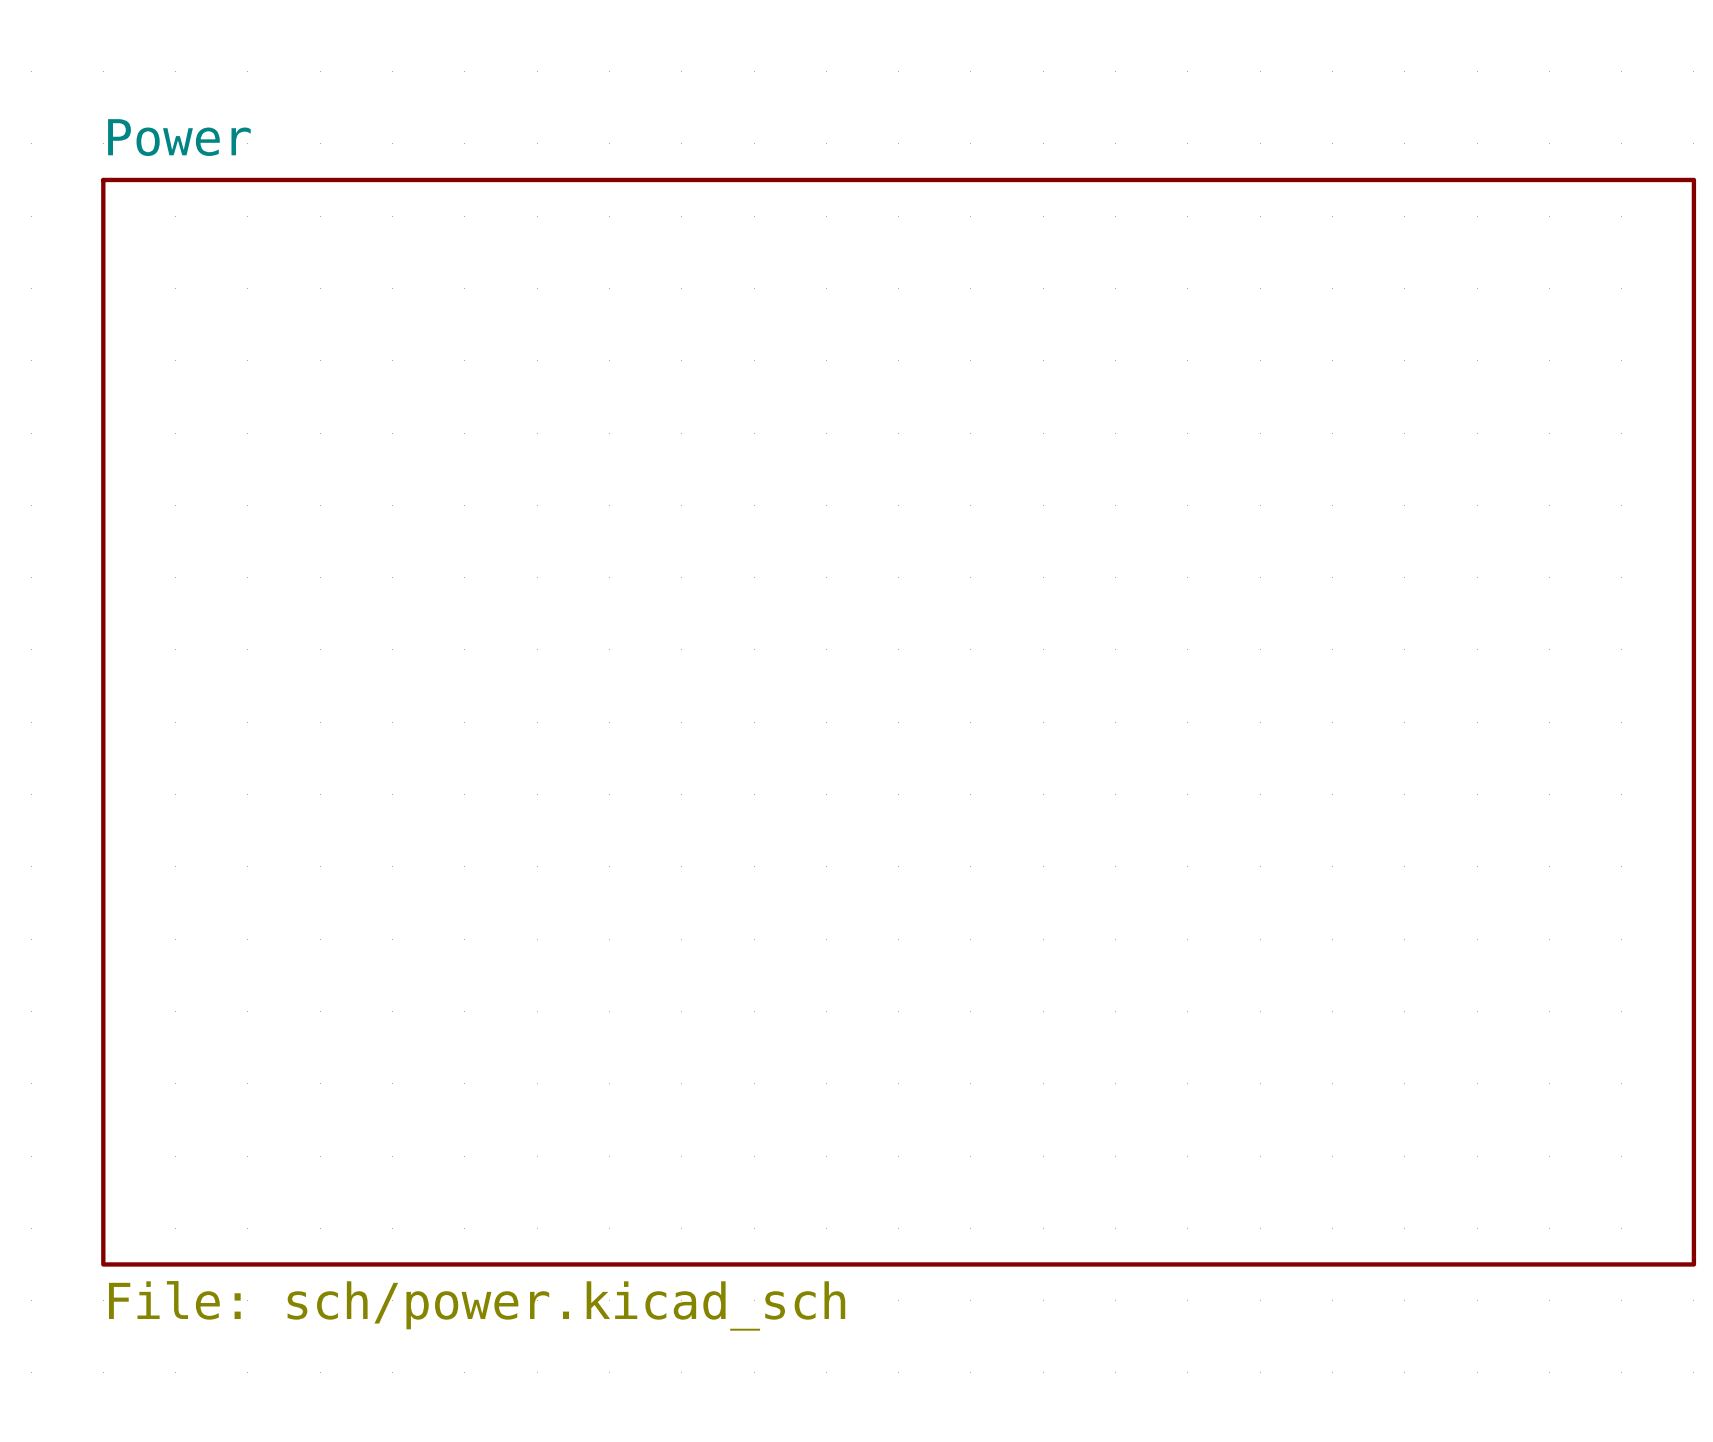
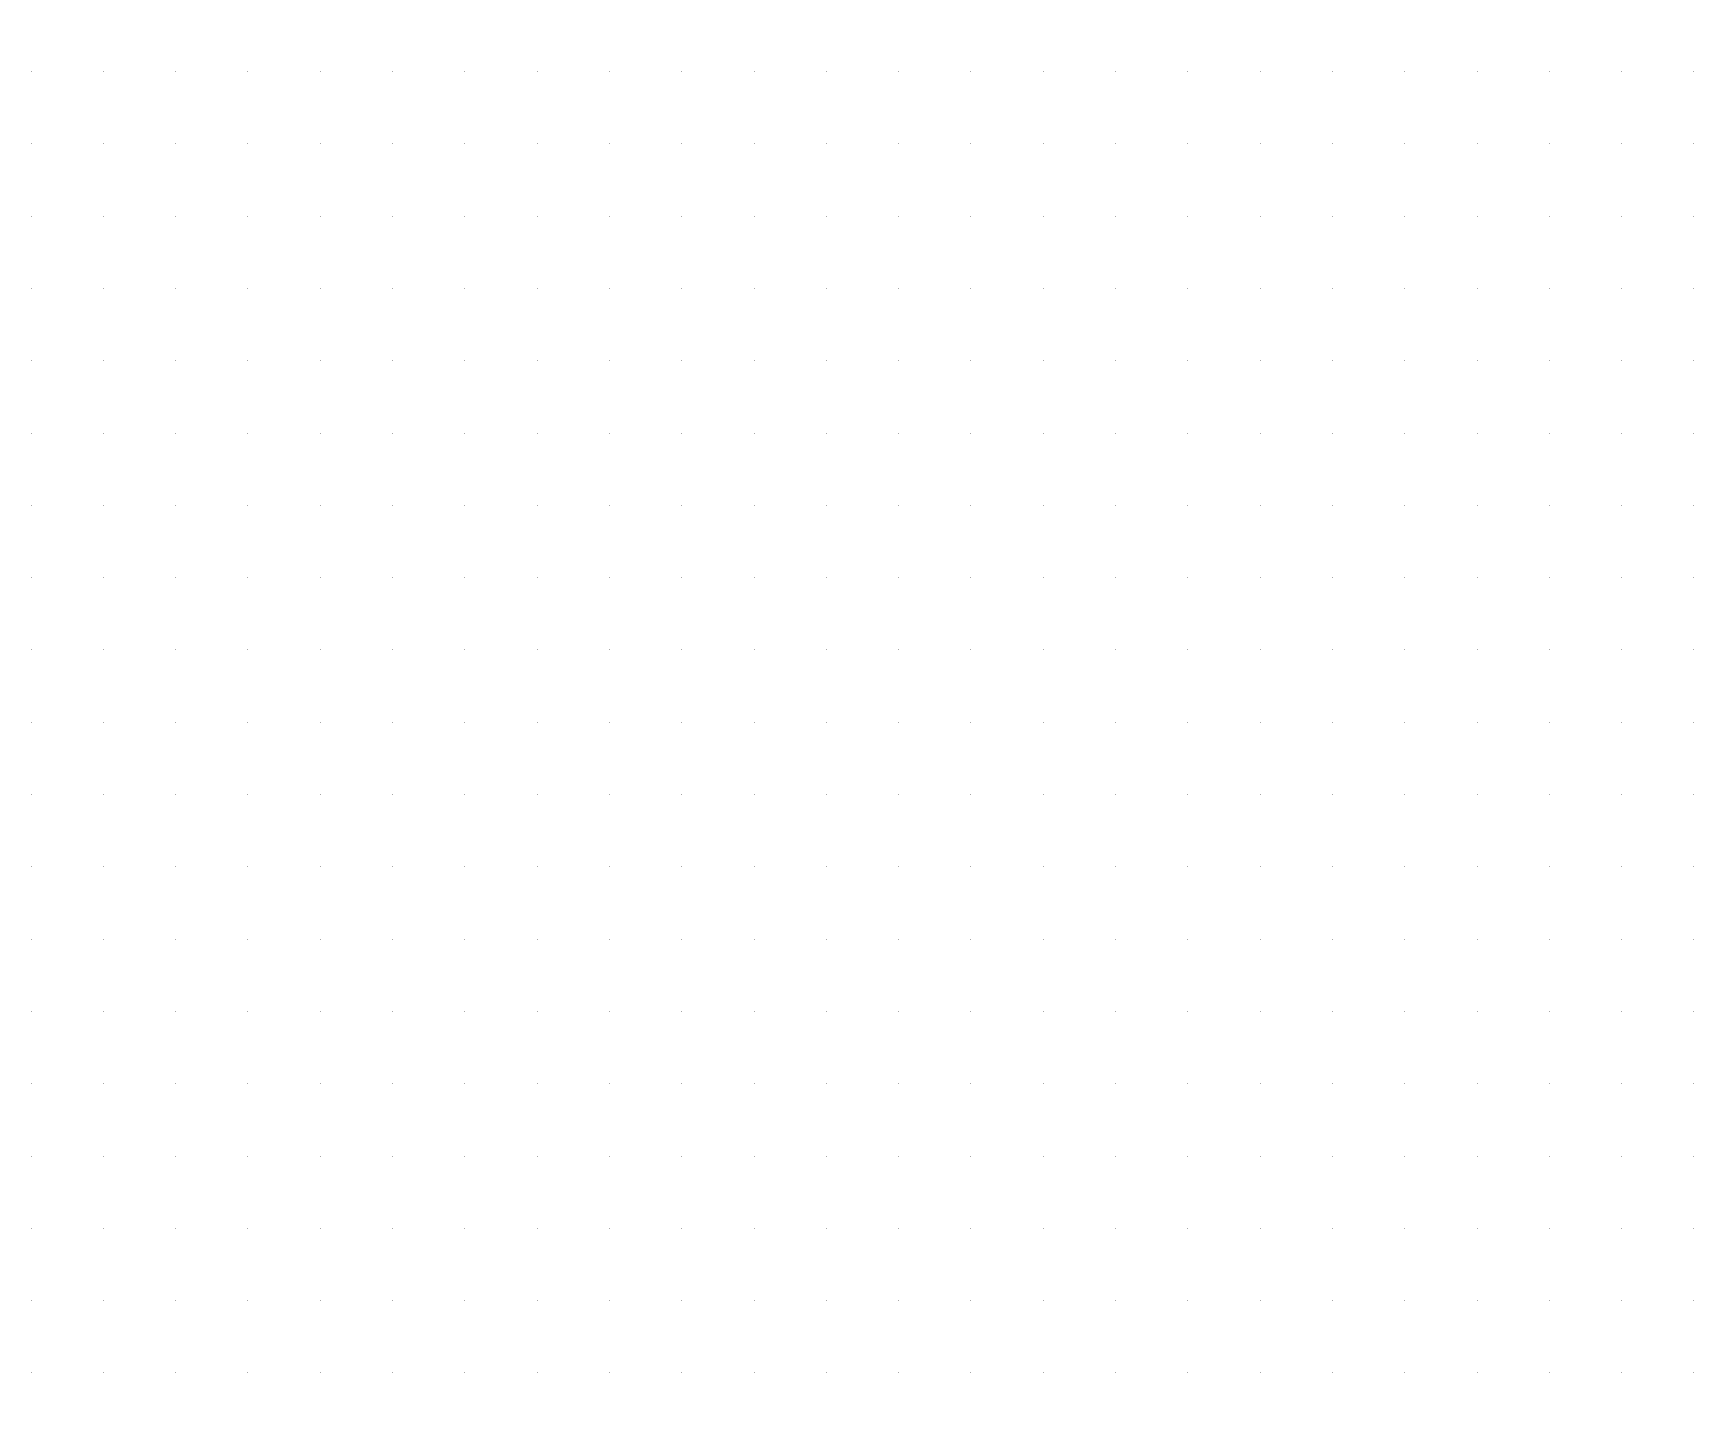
sheet Power: File: sch/power.kicad_sch (898, 722) -> none

